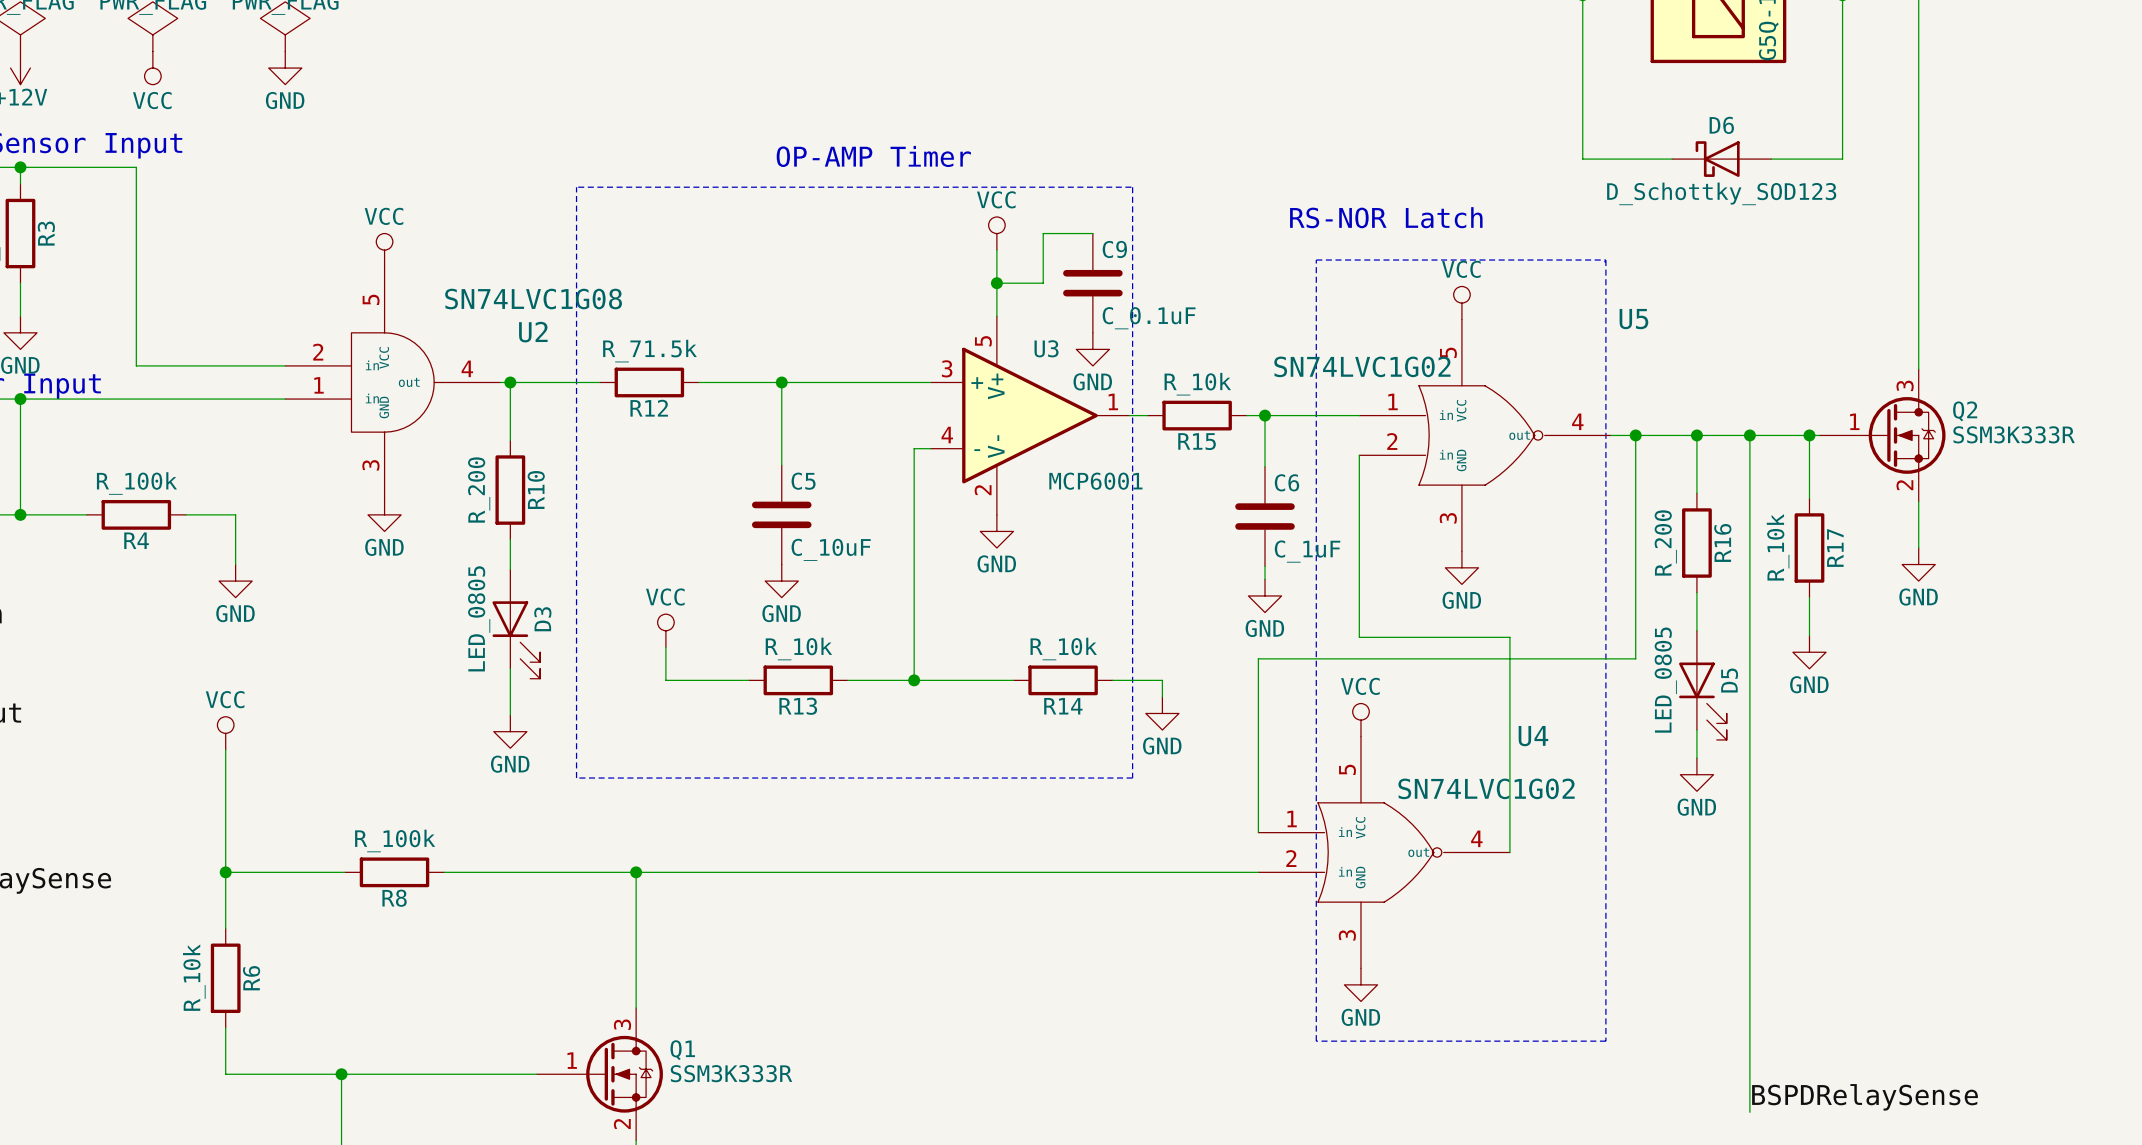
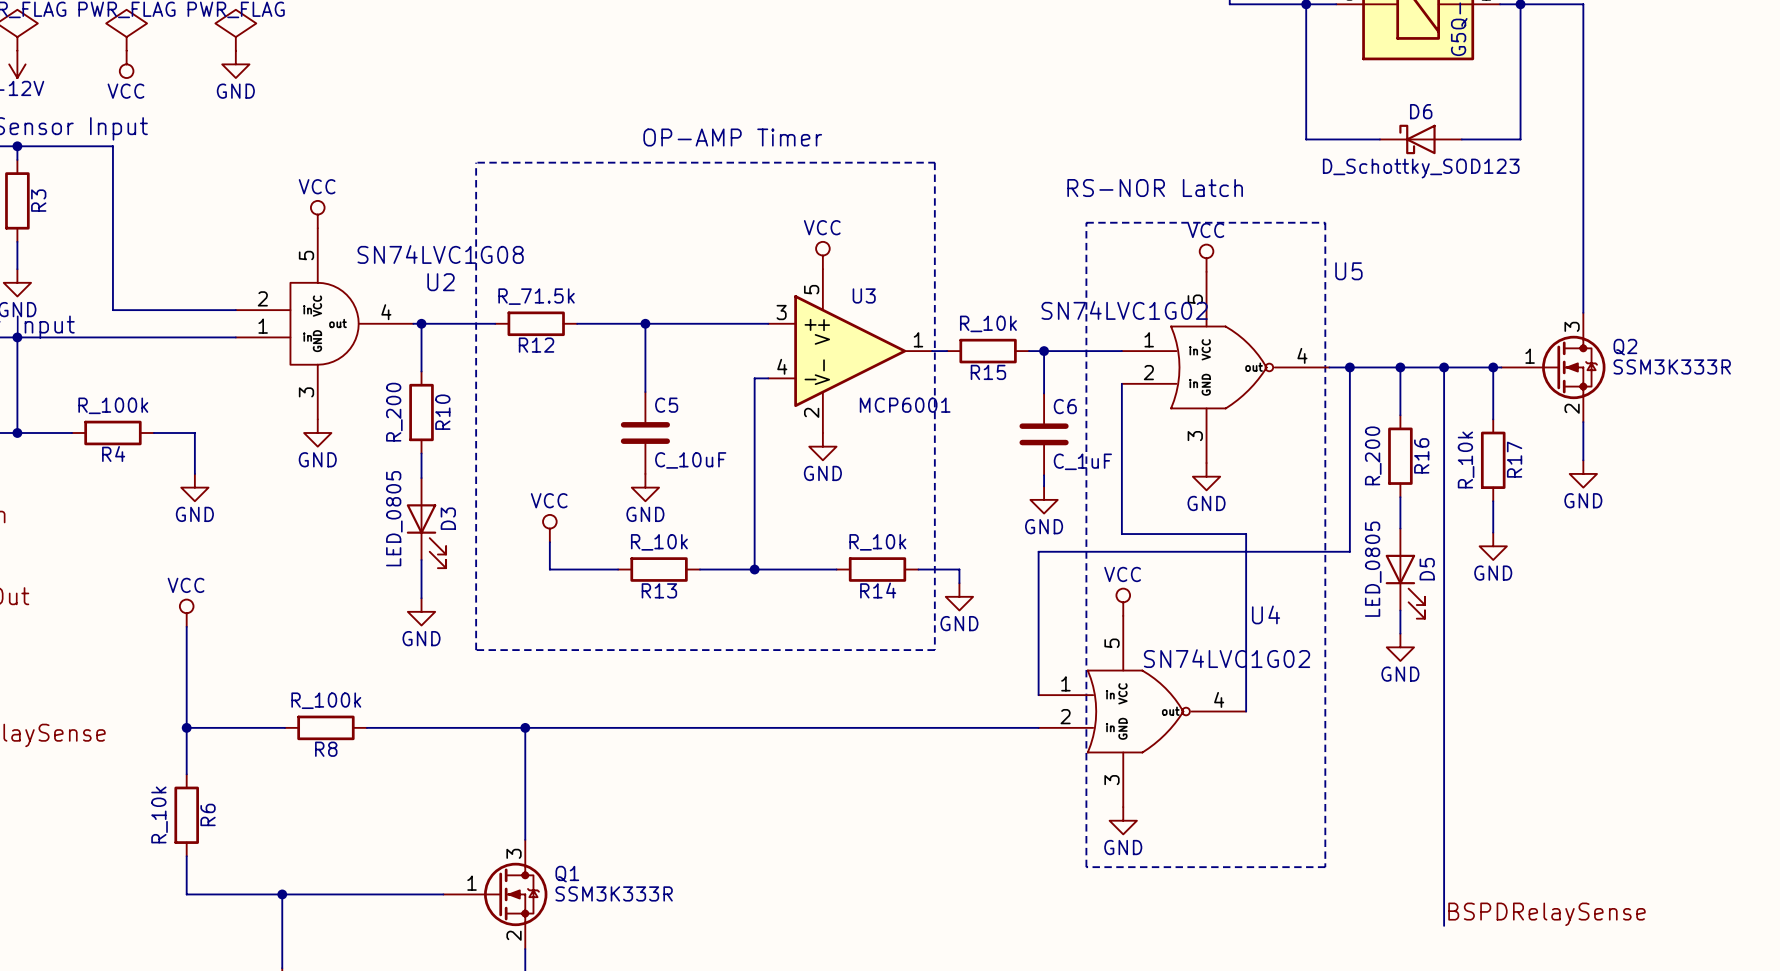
power symbol position: VCC (996, 233) -> VCC (822, 255)
wire: (1092, 233) (1043, 233) (1043, 283) (996, 283) -> none
wire: (996, 250) (996, 316) -> none
junction: (996, 283) -> none
C9: C_0.1uF (1092, 283) -> none
power symbol: GND (1092, 349) -> none

